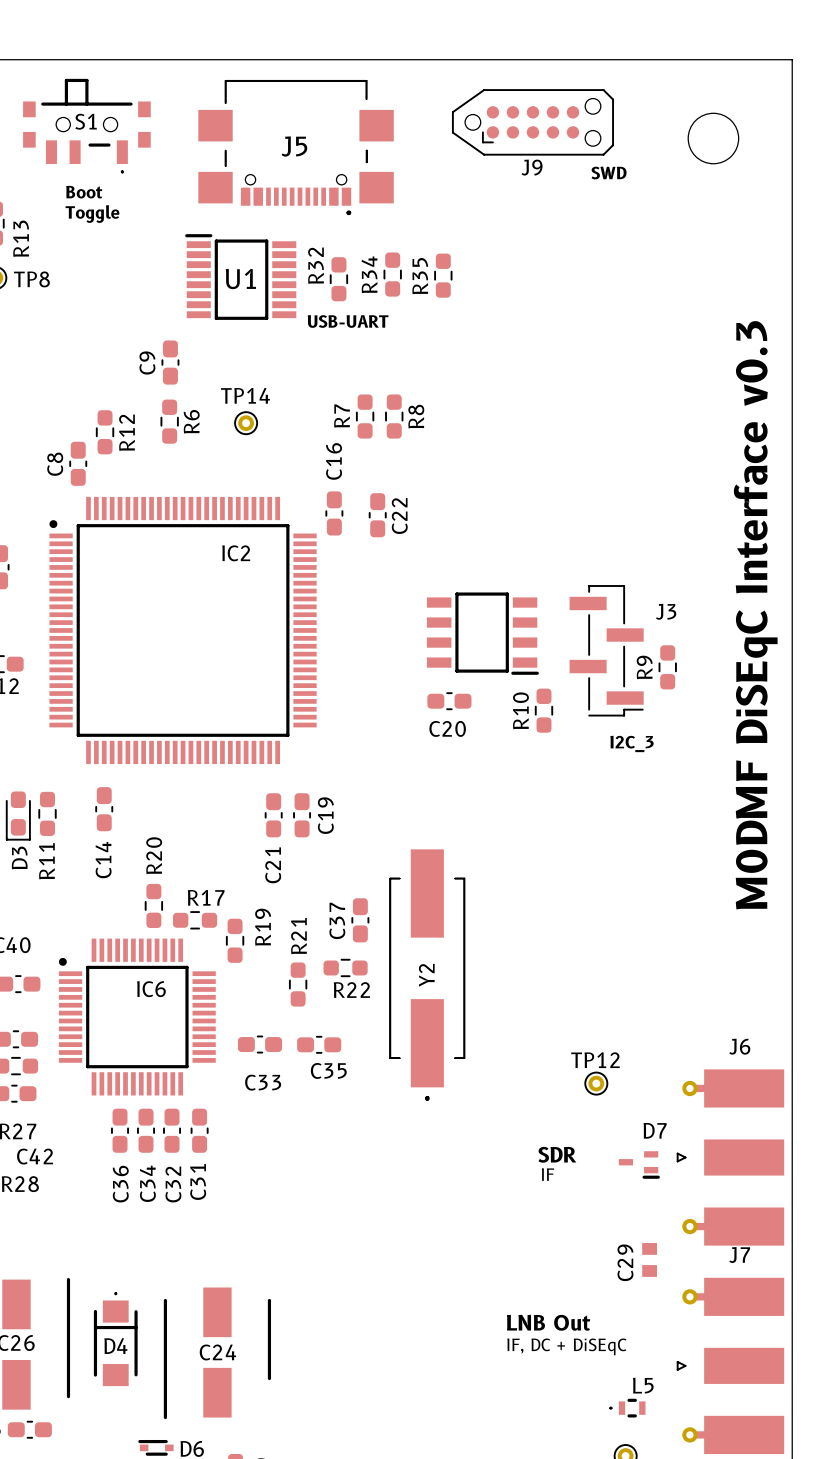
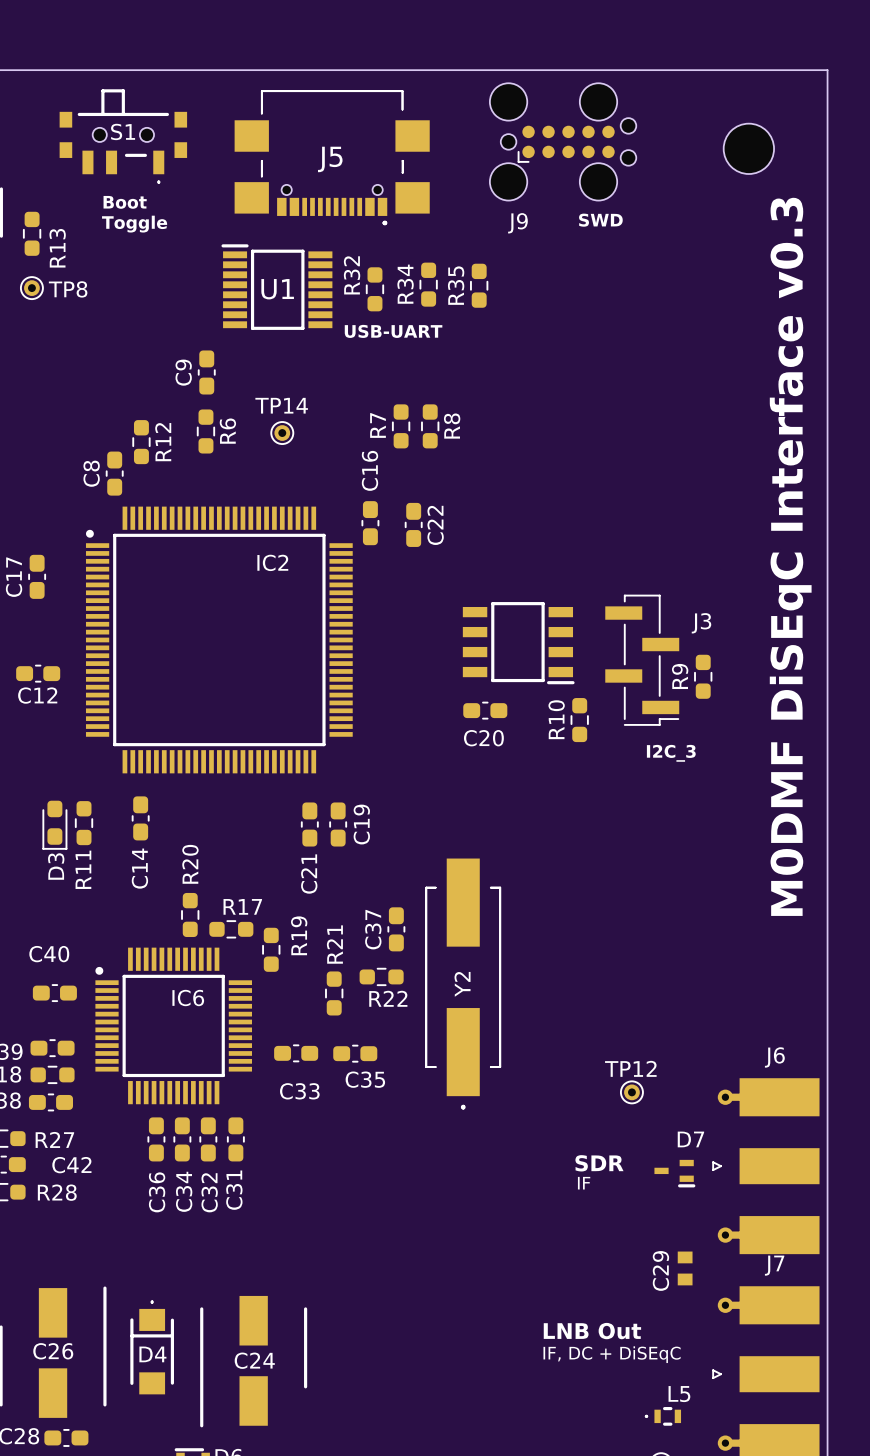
J9 footprint: [451, 89, 614, 156] -> [489, 83, 637, 201]
J9 name position: J9 (532, 167) -> J9 (517, 223)
text position: SWD (609, 172) -> SWD (600, 220)

